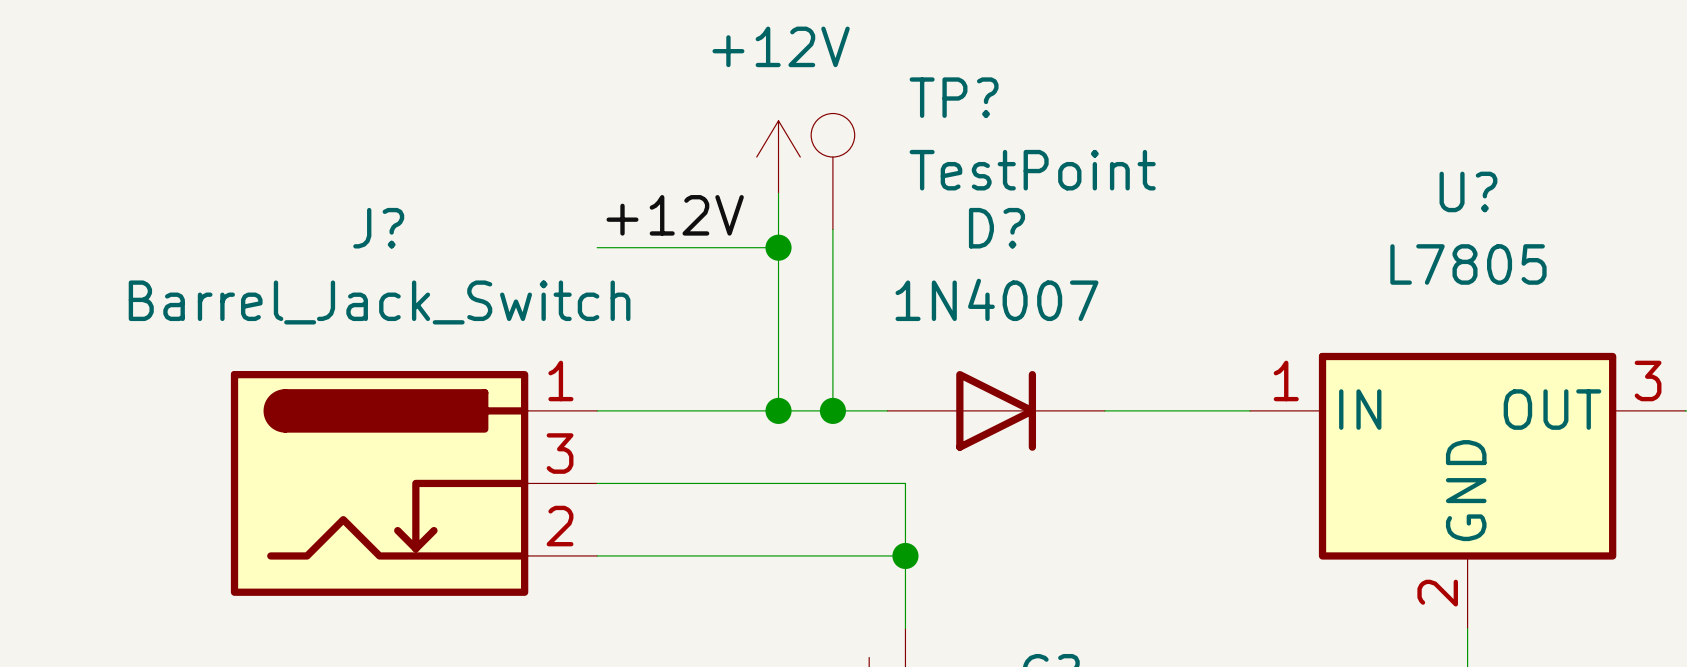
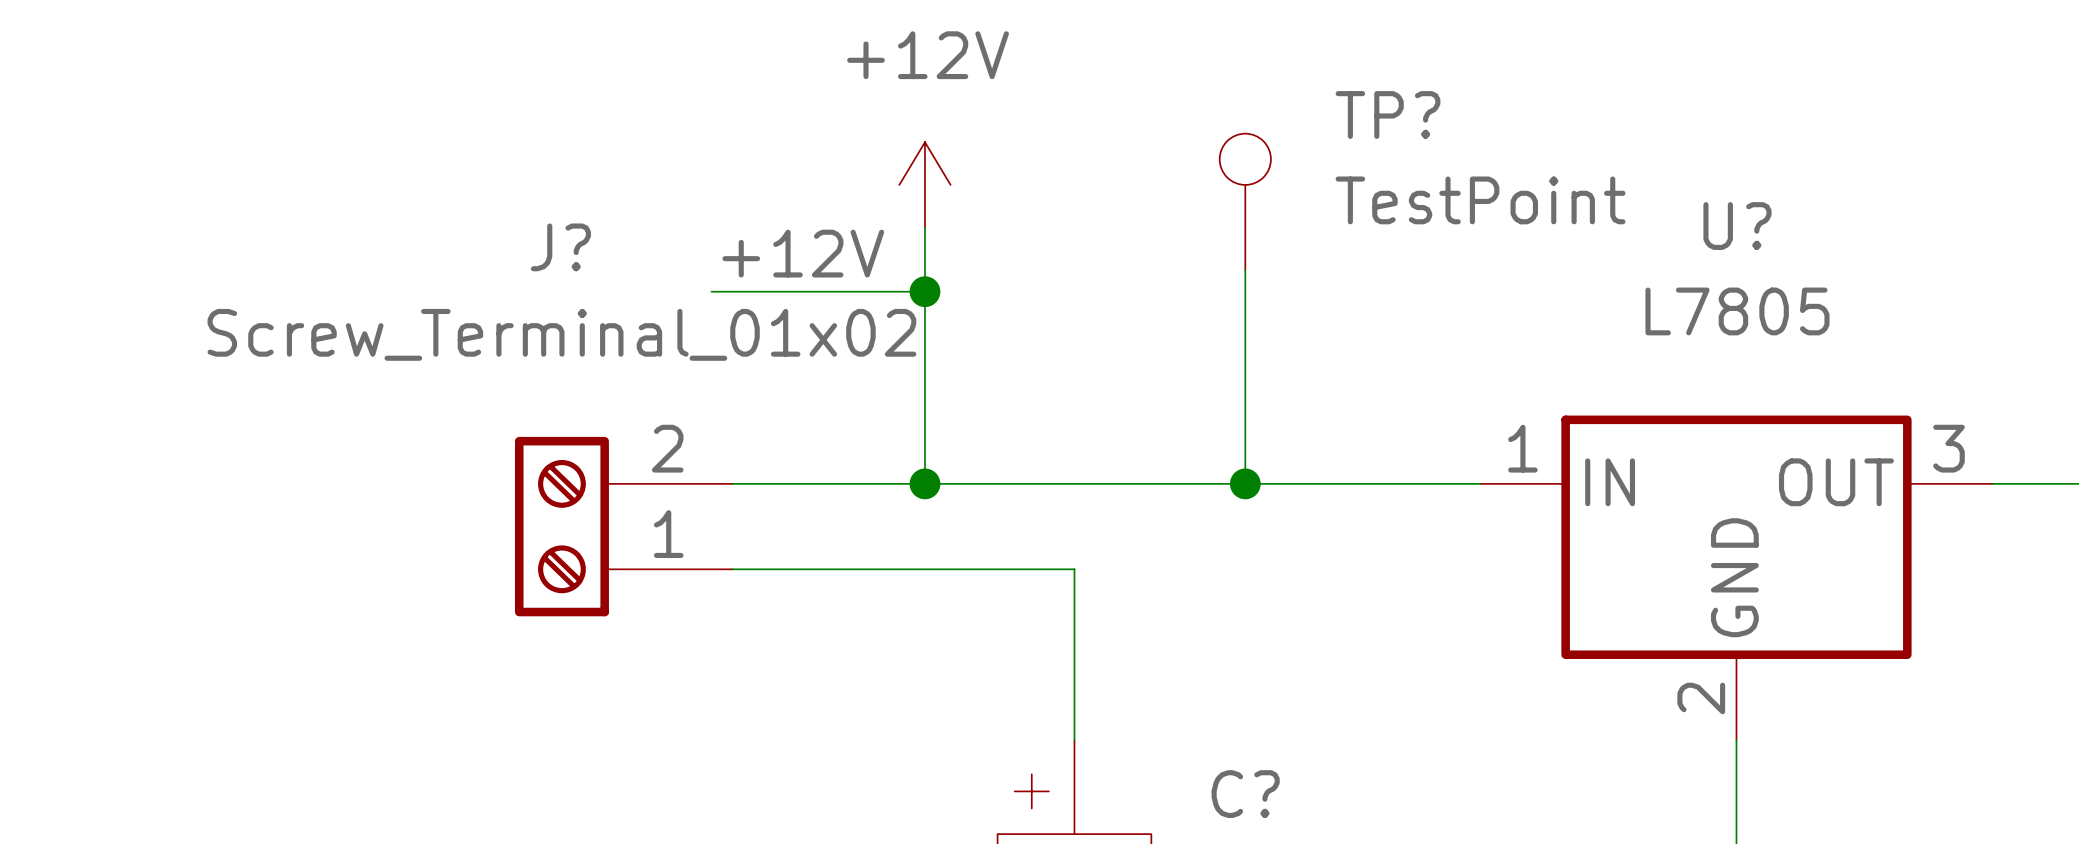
TP? position: (832, 171) -> (1245, 202)
wire: (832, 229) (832, 410) -> (1245, 270) (1245, 483)
junction: (832, 410) -> none
D?: 1N4007 (996, 410) -> none
junction: none -> (1245, 483)
J?: none -> Screw_Terminal_01x02 (623, 526)
J?: Barrel_Jack_Switch (414, 483) -> none
wire: (597, 555) (905, 555) -> none
junction: (905, 555) -> none

